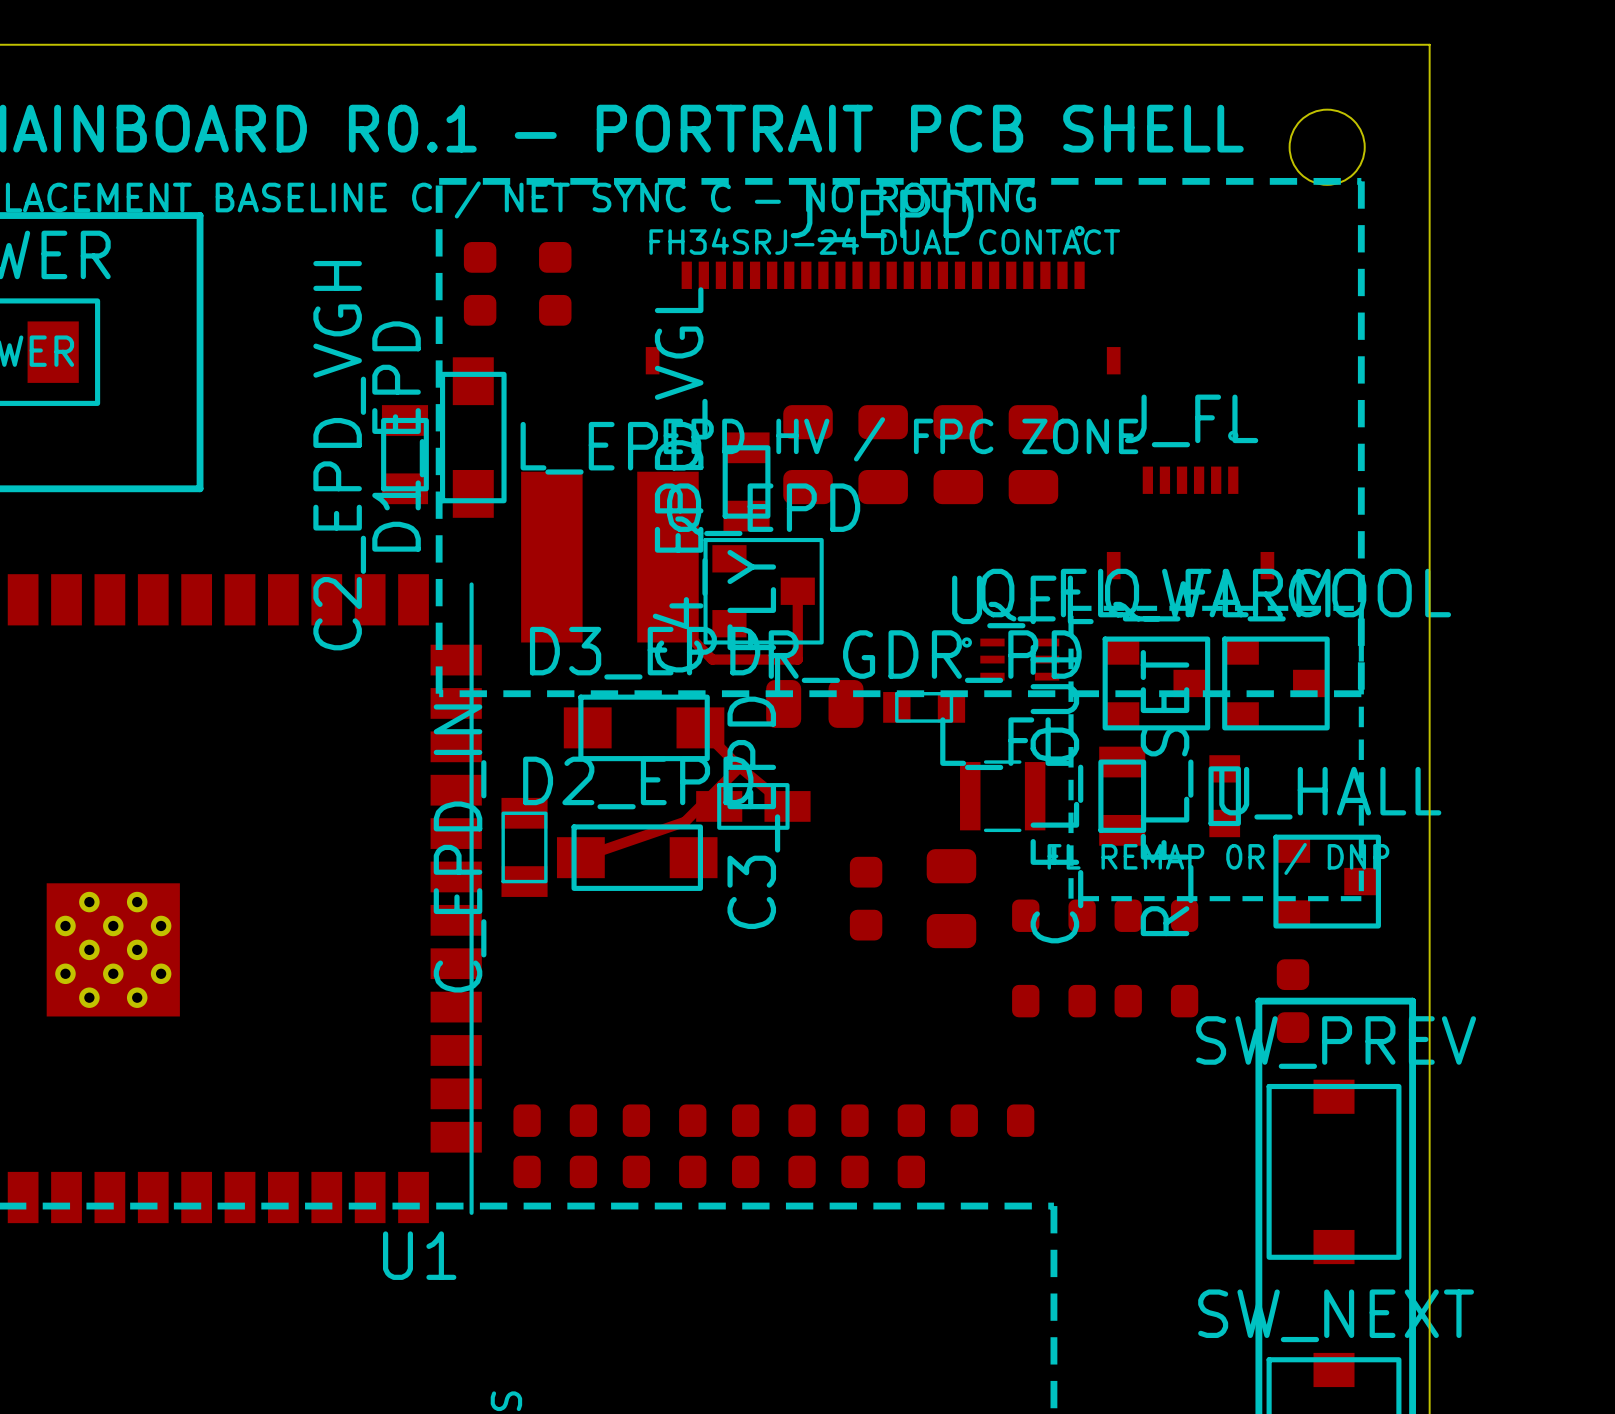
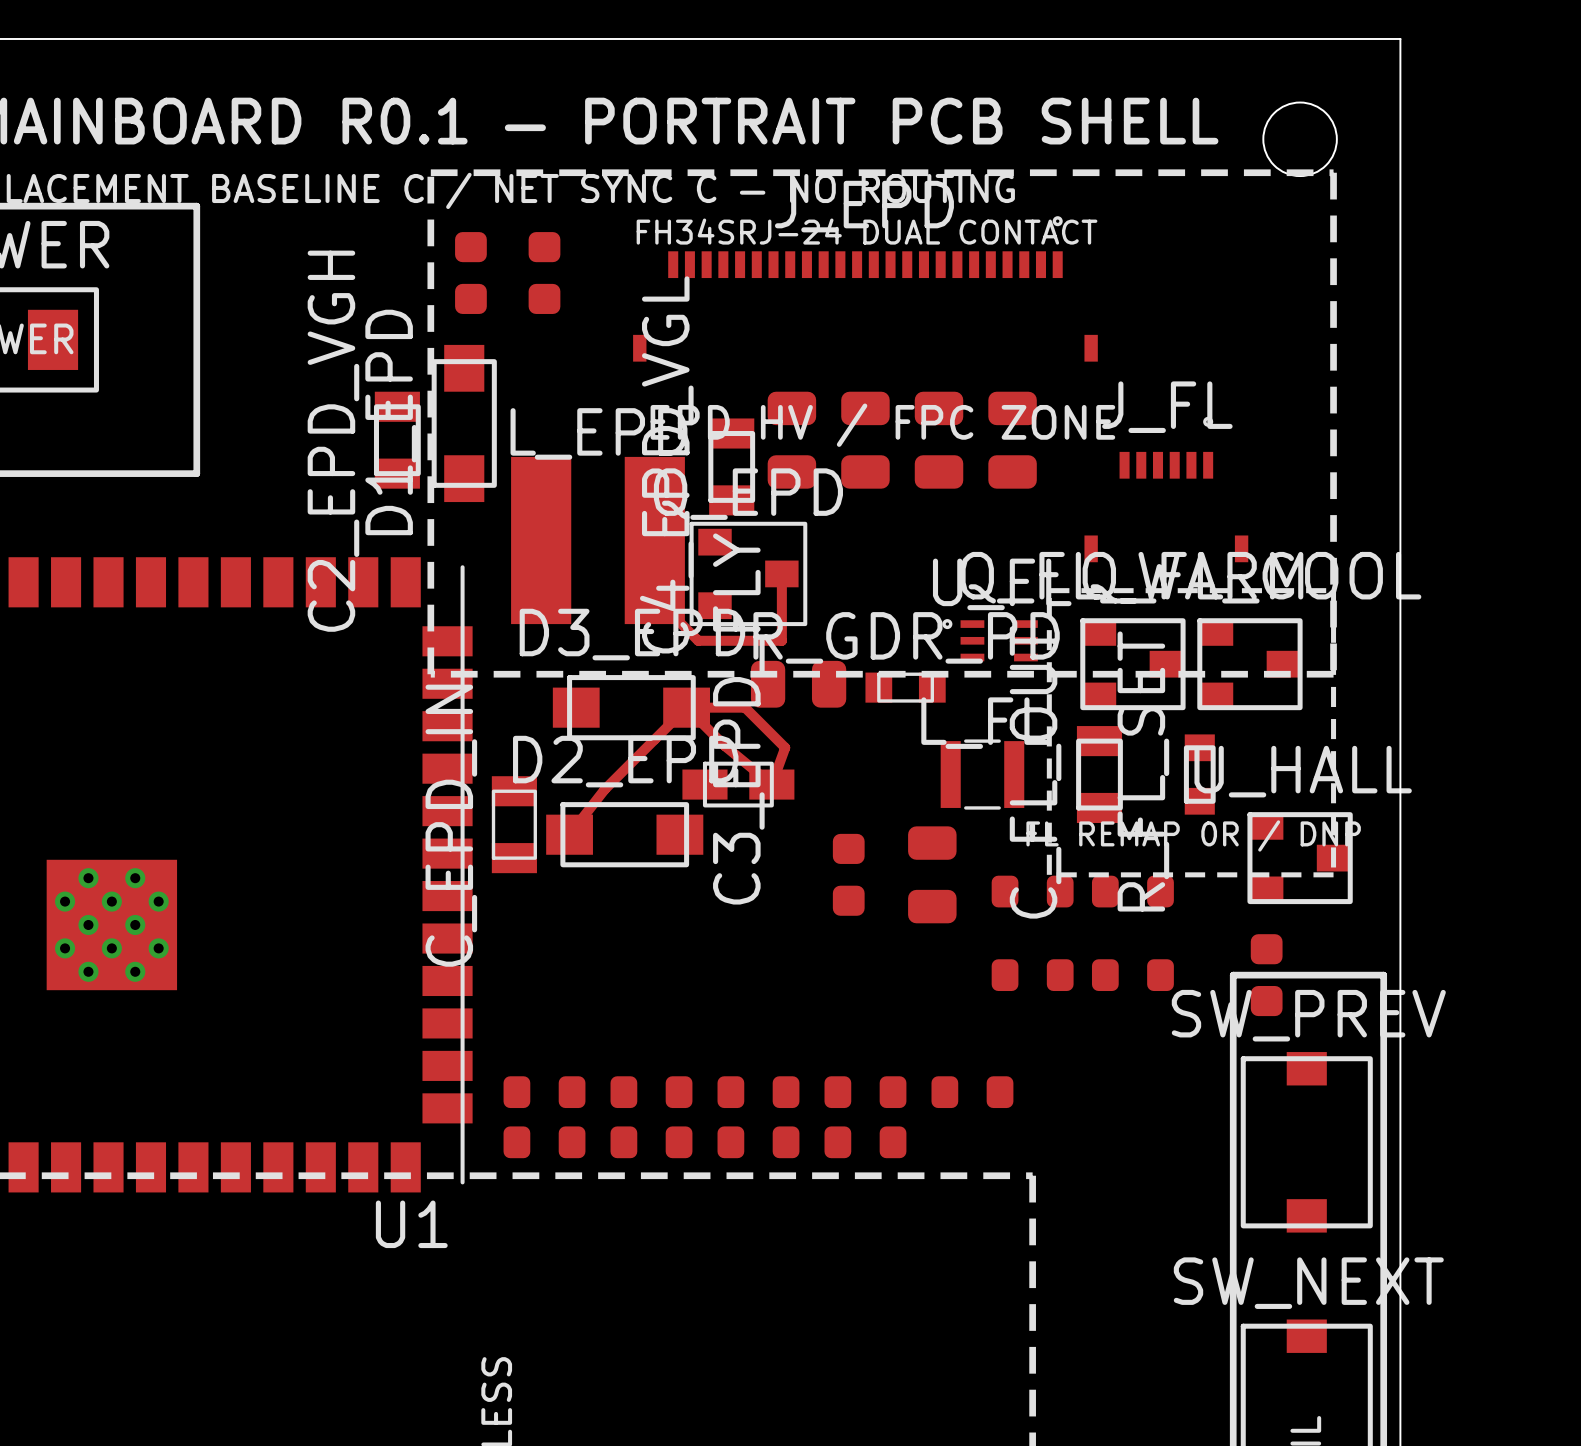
track: (739, 767) (685, 821) (580, 857) -> (771, 784) (785, 747) (745, 707) (686, 707) (604, 789) (569, 834)

